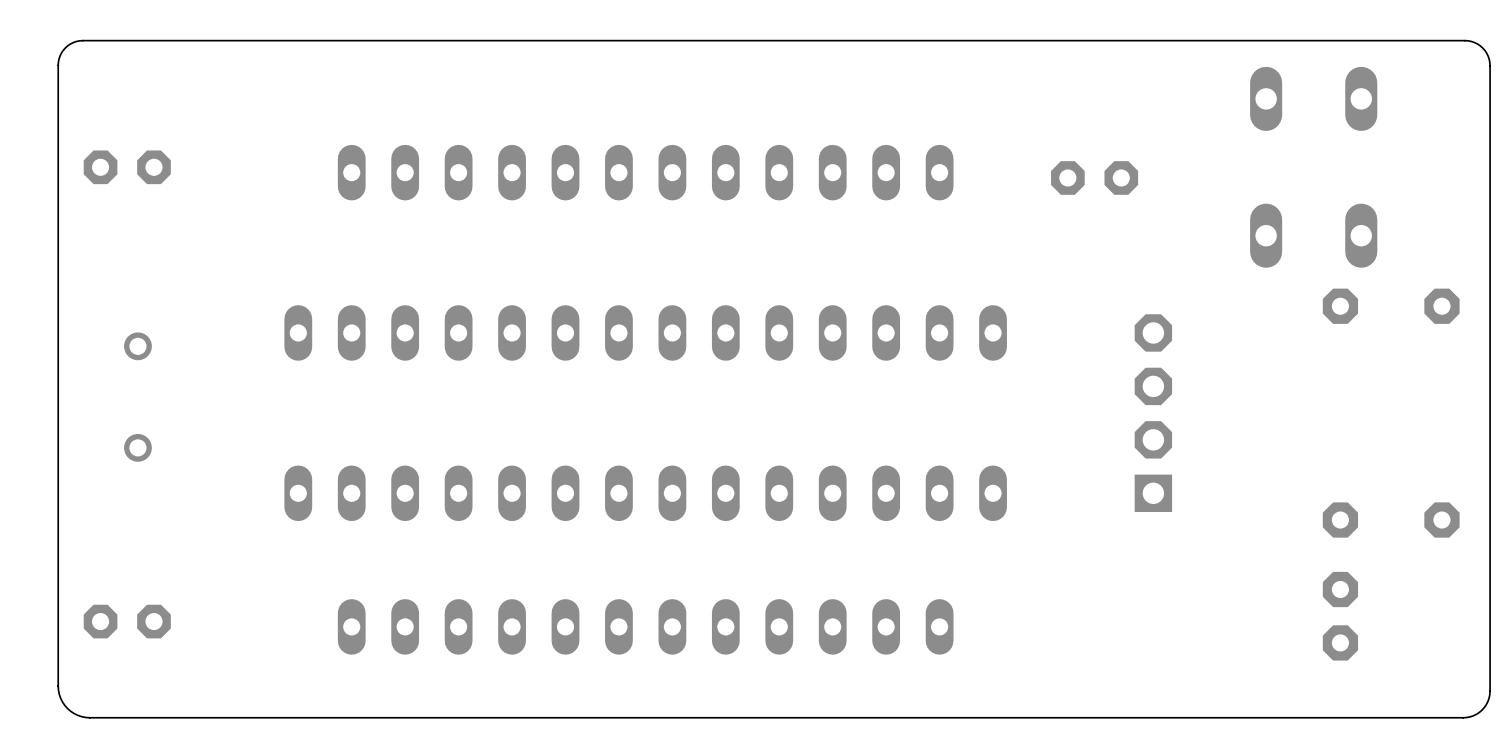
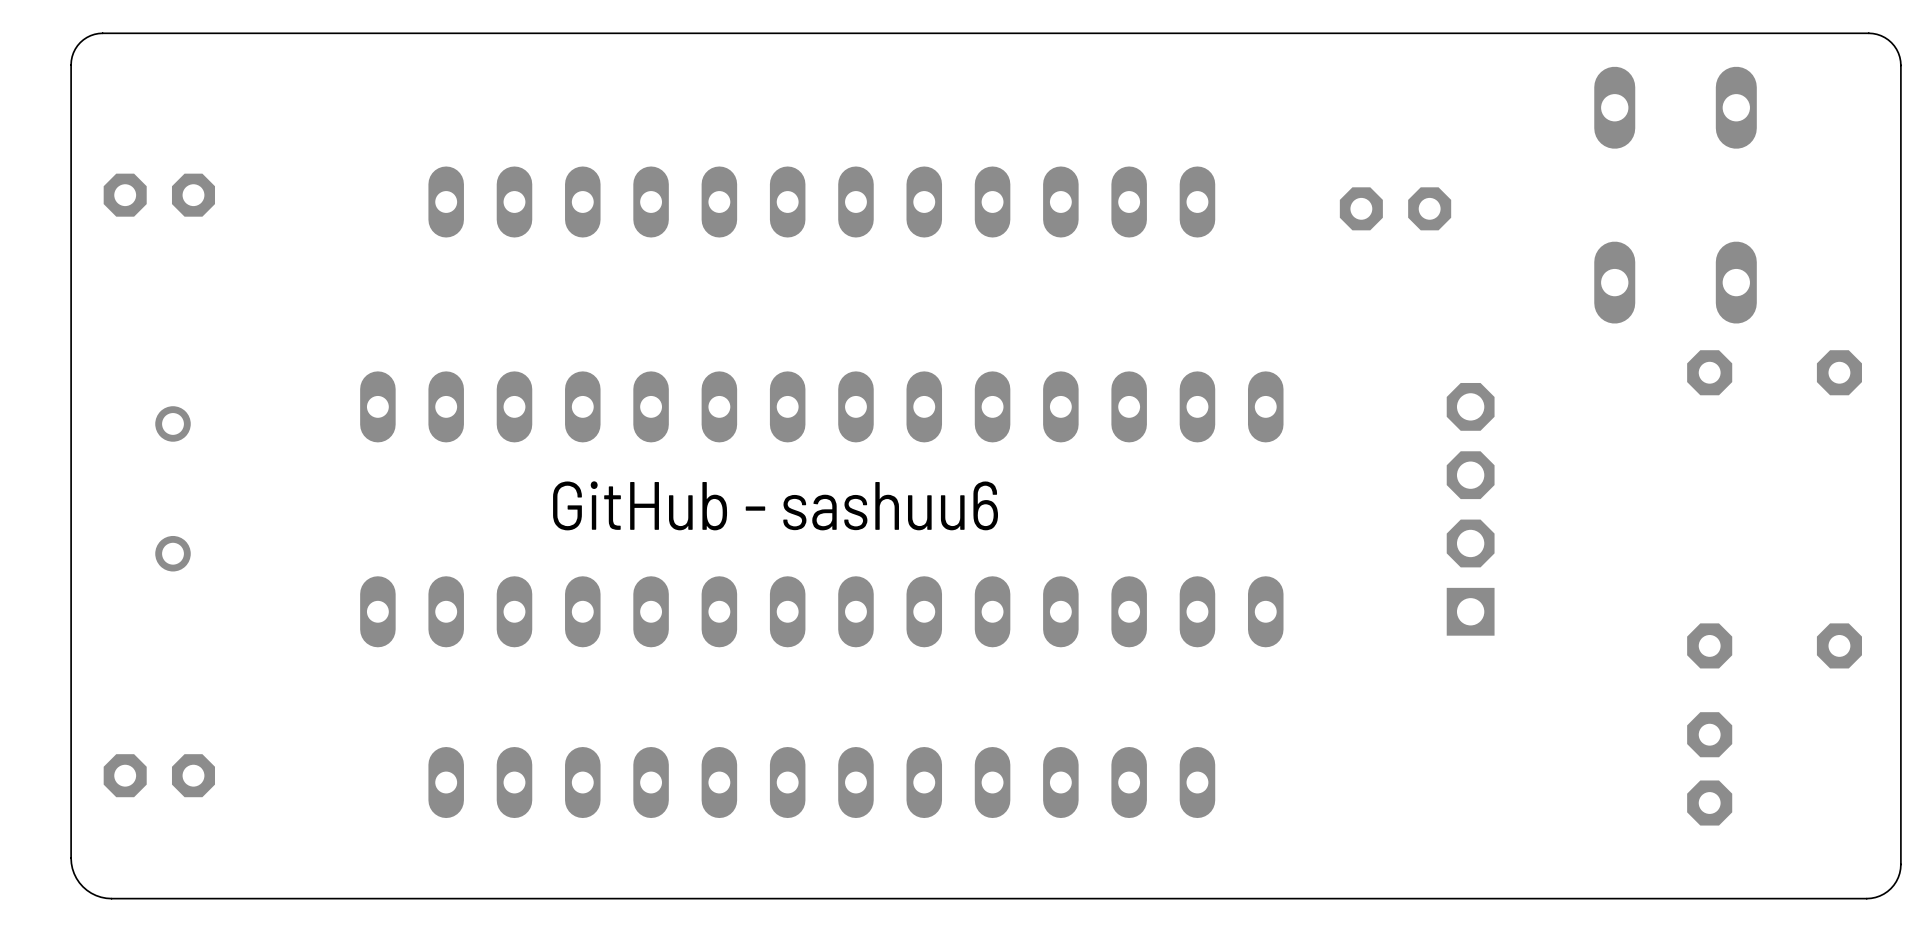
text: none -> GitHub - sashuu6 (775, 505)

